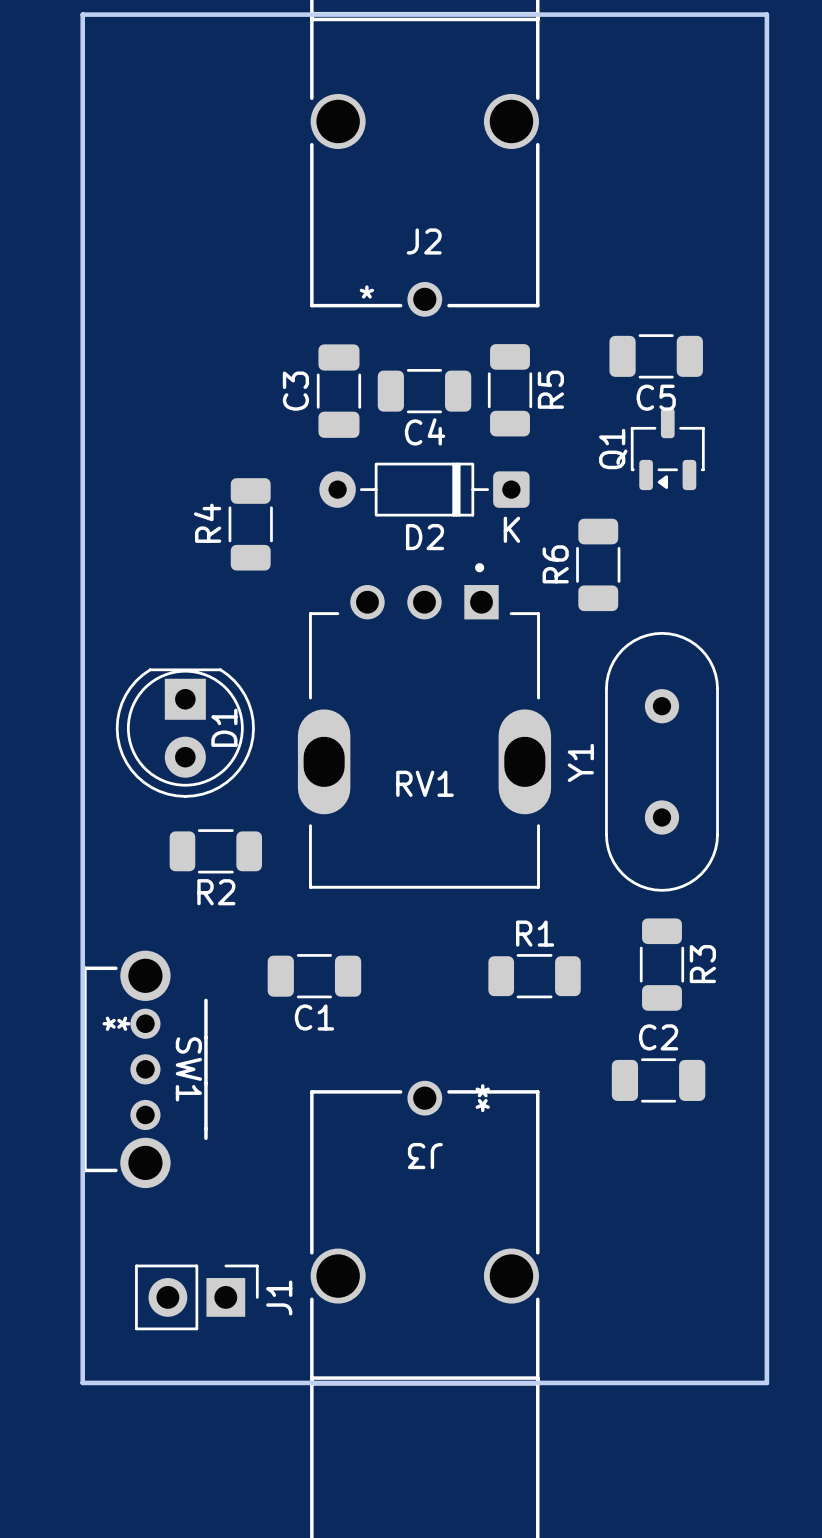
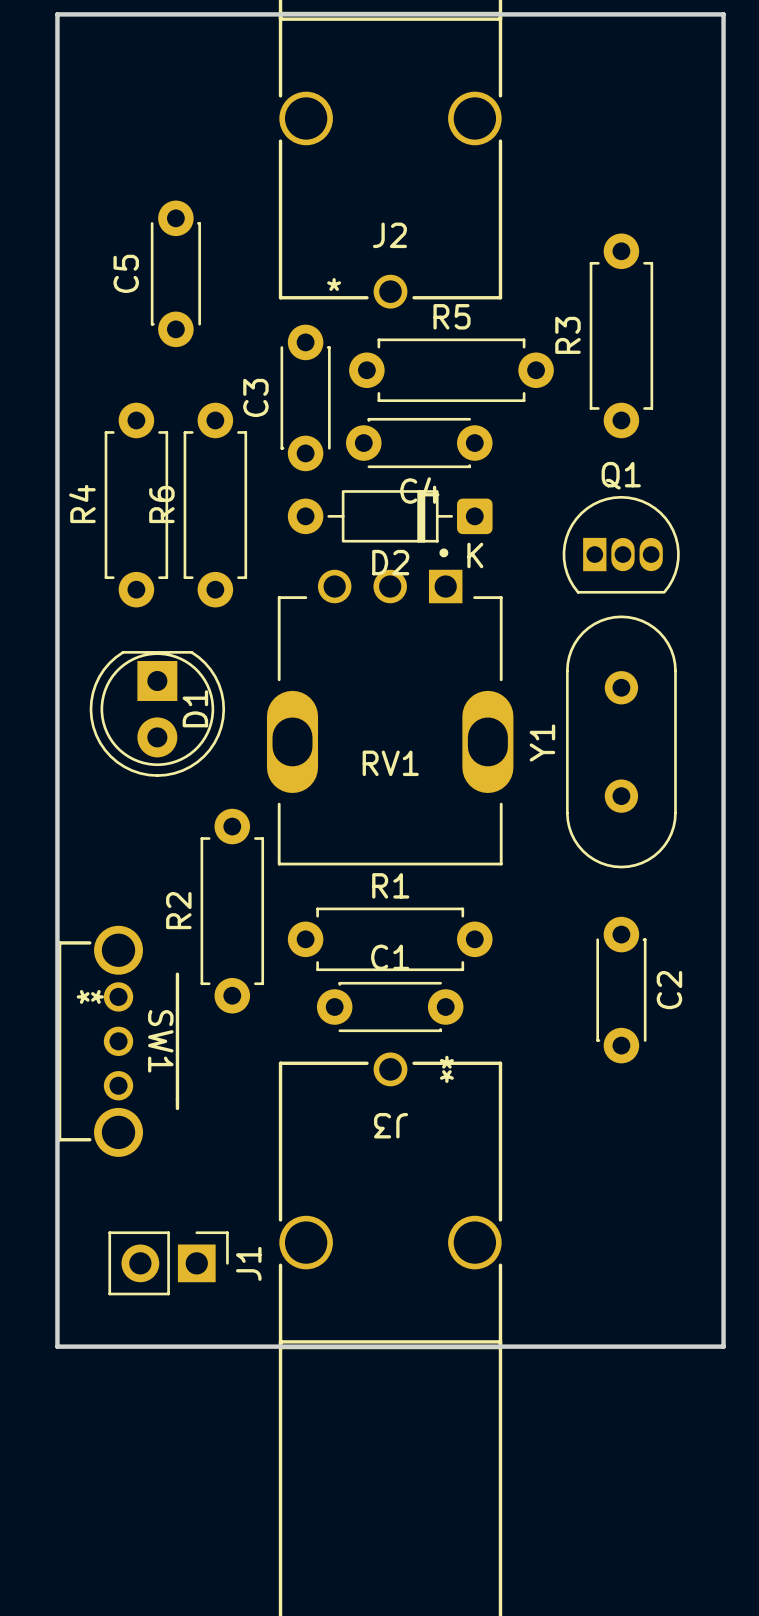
C5 footprint: [609, 334, 703, 379] -> [150, 200, 201, 348]
C3 footprint: [316, 344, 362, 438] -> [280, 324, 331, 472]
R5 footprint: [487, 344, 533, 437] -> [349, 338, 554, 403]
C4 footprint: [377, 369, 472, 414] -> [346, 417, 493, 469]
R5 name position: R5 (550, 389) -> R5 (452, 316)
C5 name position: C5 (656, 397) -> C5 (126, 273)
Q1 footprint: [630, 407, 705, 491] -> [562, 495, 680, 594]
Q1 name position: Q1 (613, 449) -> Q1 (621, 475)
R4 footprint: [228, 478, 273, 571] -> [104, 402, 169, 608]
D2 position: (424, 489) -> (390, 516)
R6 footprint: [576, 518, 621, 612] -> [183, 402, 248, 608]
R2 footprint: [169, 829, 263, 874] -> [200, 808, 265, 1014]
R2 name position: R2 (216, 892) -> R2 (178, 910)
R3 footprint: [639, 918, 685, 1011] -> [589, 233, 654, 439]
C1 footprint: [267, 954, 362, 999] -> [316, 981, 464, 1033]
R1 footprint: [488, 954, 581, 999] -> [287, 907, 493, 972]
R3 name position: R3 (702, 964) -> R3 (567, 335)
C1 name position: C1 (314, 1017) -> C1 (390, 957)
C2 name position: C2 (658, 1037) -> C2 (669, 990)
C2 footprint: [611, 1058, 706, 1103] -> [596, 916, 647, 1064]

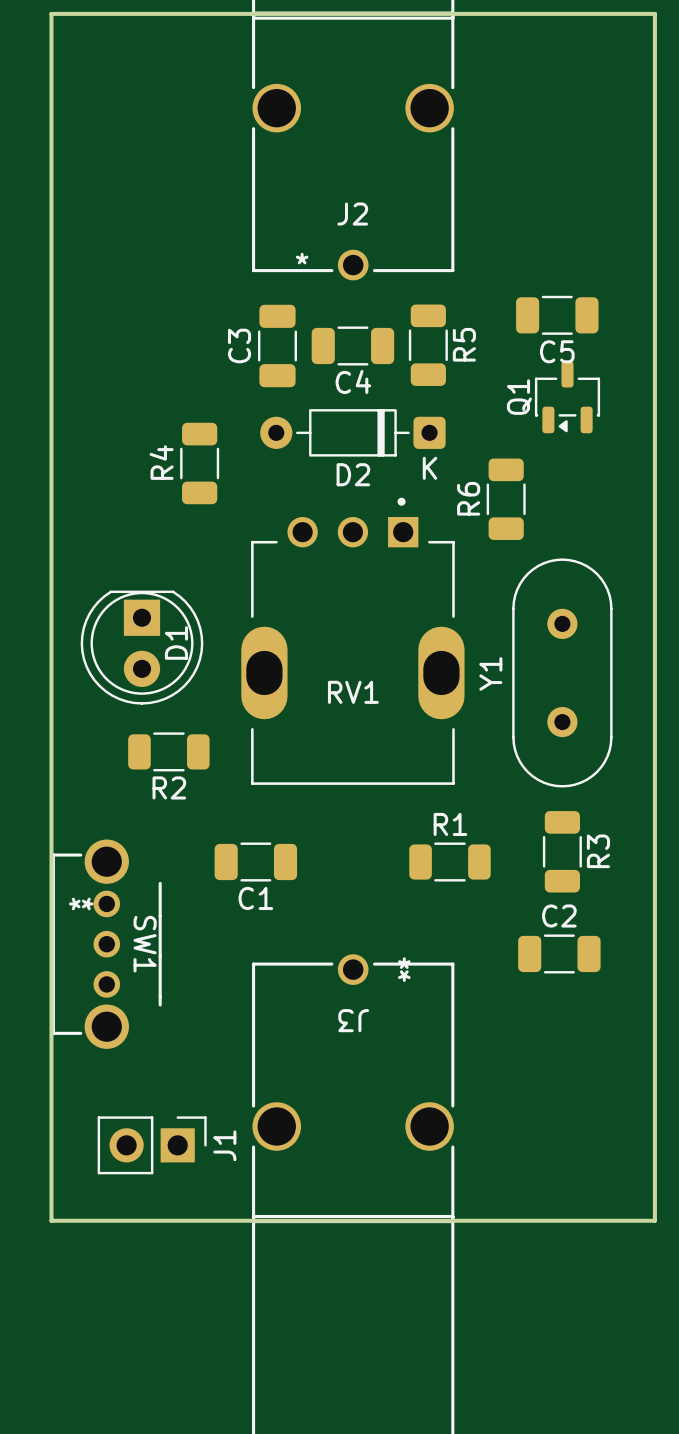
C5 footprint: [150, 200, 201, 348] -> [516, 295, 599, 335]
R3 footprint: [589, 233, 654, 439] -> [542, 811, 582, 893]
C5 name position: C5 (126, 273) -> C5 (557, 351)
R5 name position: R5 (452, 316) -> R5 (464, 344)
C3 footprint: [280, 324, 331, 472] -> [257, 304, 298, 388]
R3 name position: R3 (567, 335) -> R3 (598, 851)
R5 footprint: [349, 338, 554, 403] -> [408, 304, 448, 386]
R4 footprint: [104, 402, 169, 608] -> [180, 422, 220, 505]
R6 footprint: [183, 402, 248, 608] -> [486, 458, 526, 540]
C4 footprint: [346, 417, 493, 469] -> [311, 326, 395, 366]
Q1 name position: Q1 (621, 475) -> Q1 (519, 397)
Q1 footprint: [562, 495, 680, 594] -> [534, 360, 601, 434]
D2 position: (390, 516) -> (352, 432)
R2 footprint: [200, 808, 265, 1014] -> [128, 732, 210, 772]
R1 footprint: [287, 907, 493, 972] -> [409, 842, 491, 882]
R2 name position: R2 (178, 910) -> R2 (169, 787)
C2 footprint: [596, 916, 647, 1064] -> [518, 934, 601, 974]
C1 name position: C1 (390, 957) -> C1 (255, 898)
C1 footprint: [316, 981, 464, 1033] -> [214, 842, 298, 882]
C2 name position: C2 (669, 990) -> C2 (559, 916)

